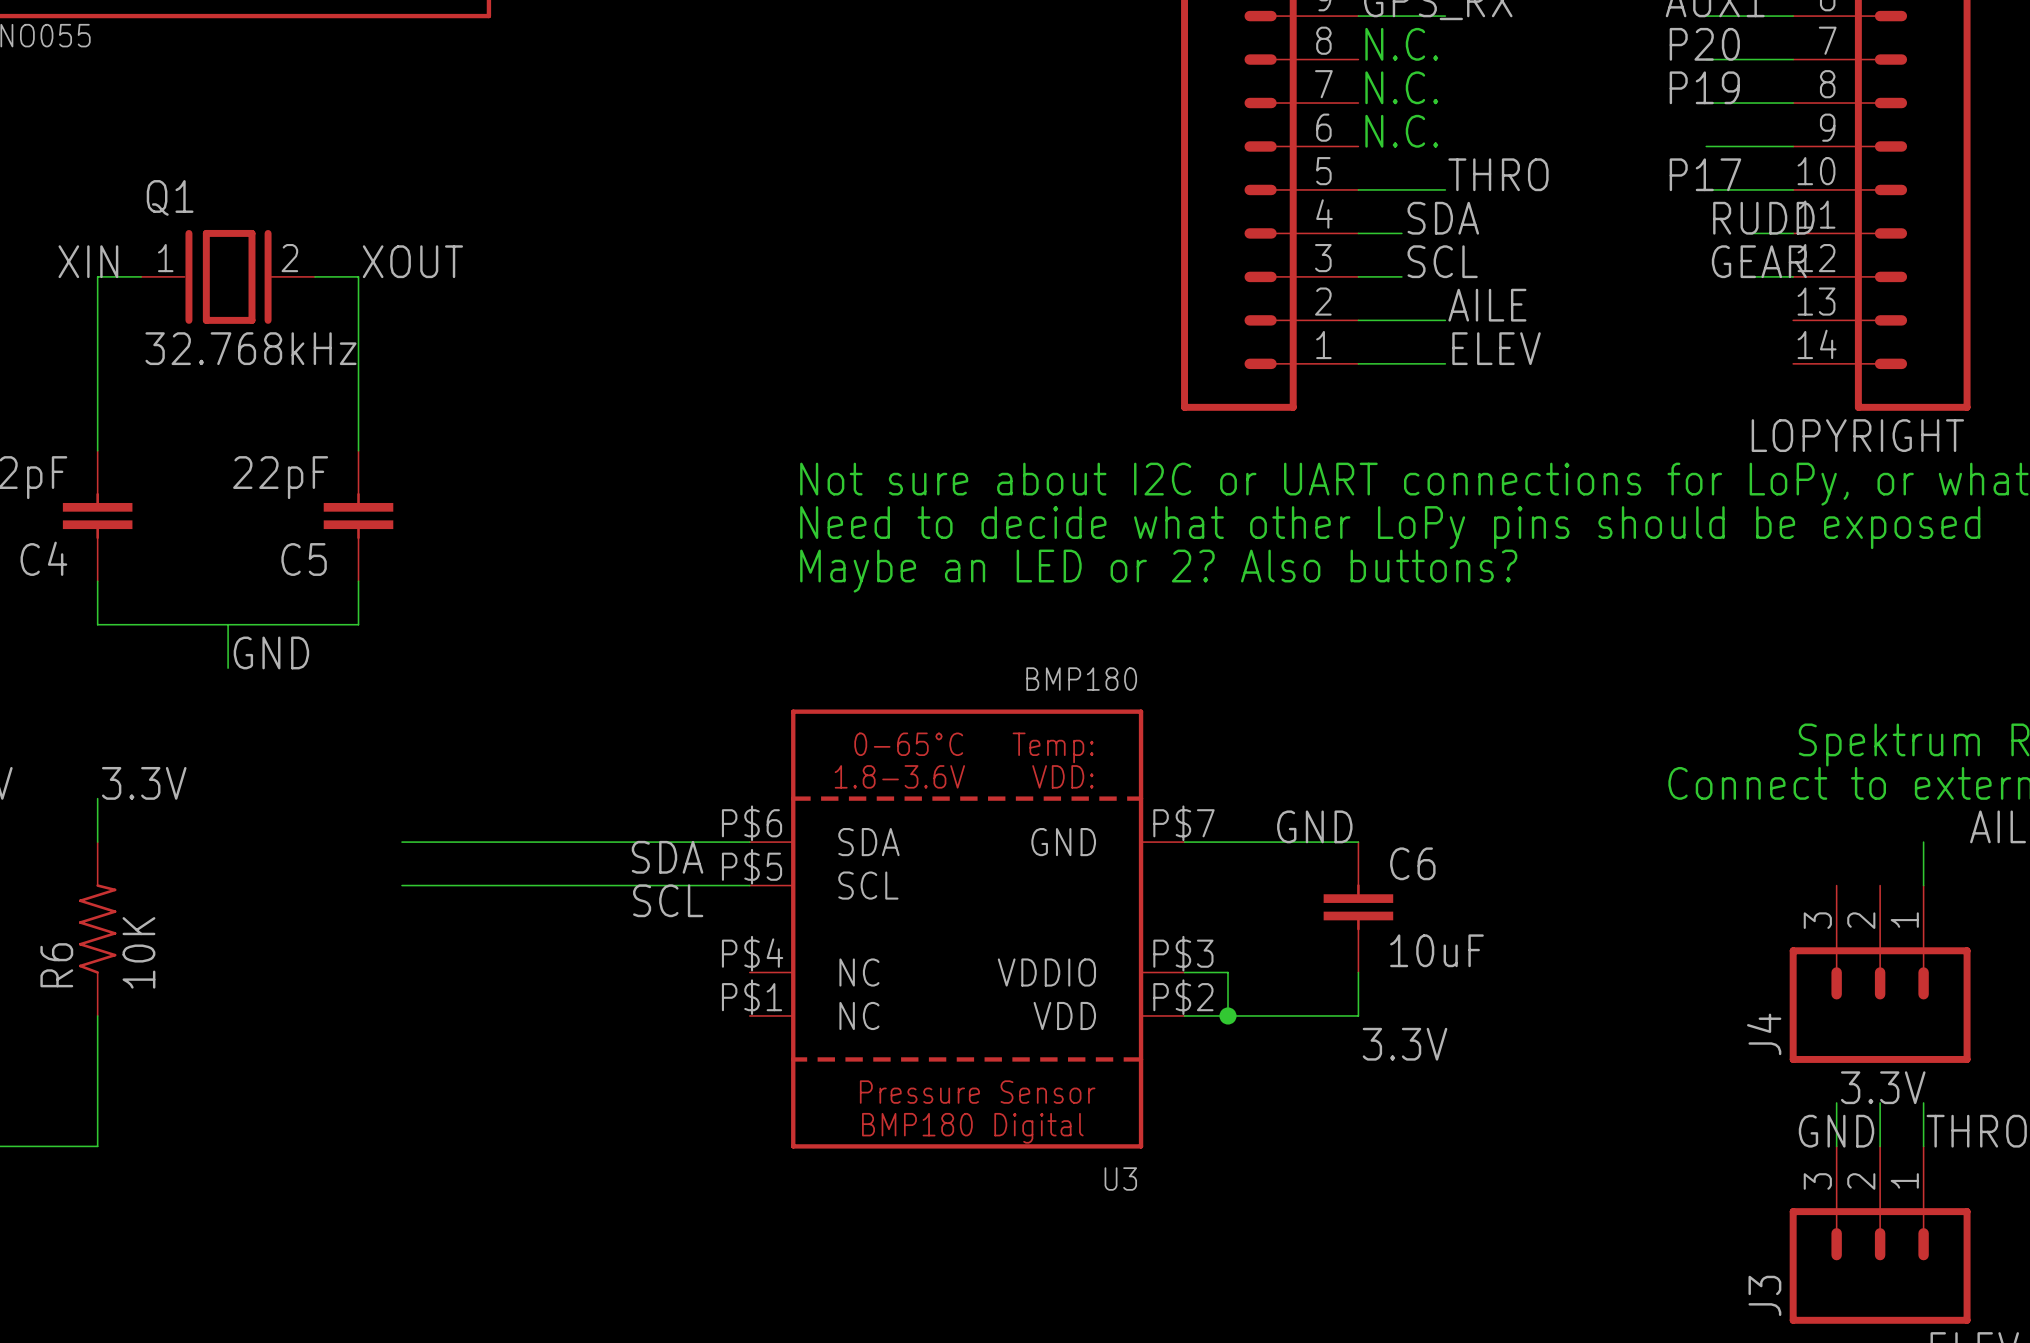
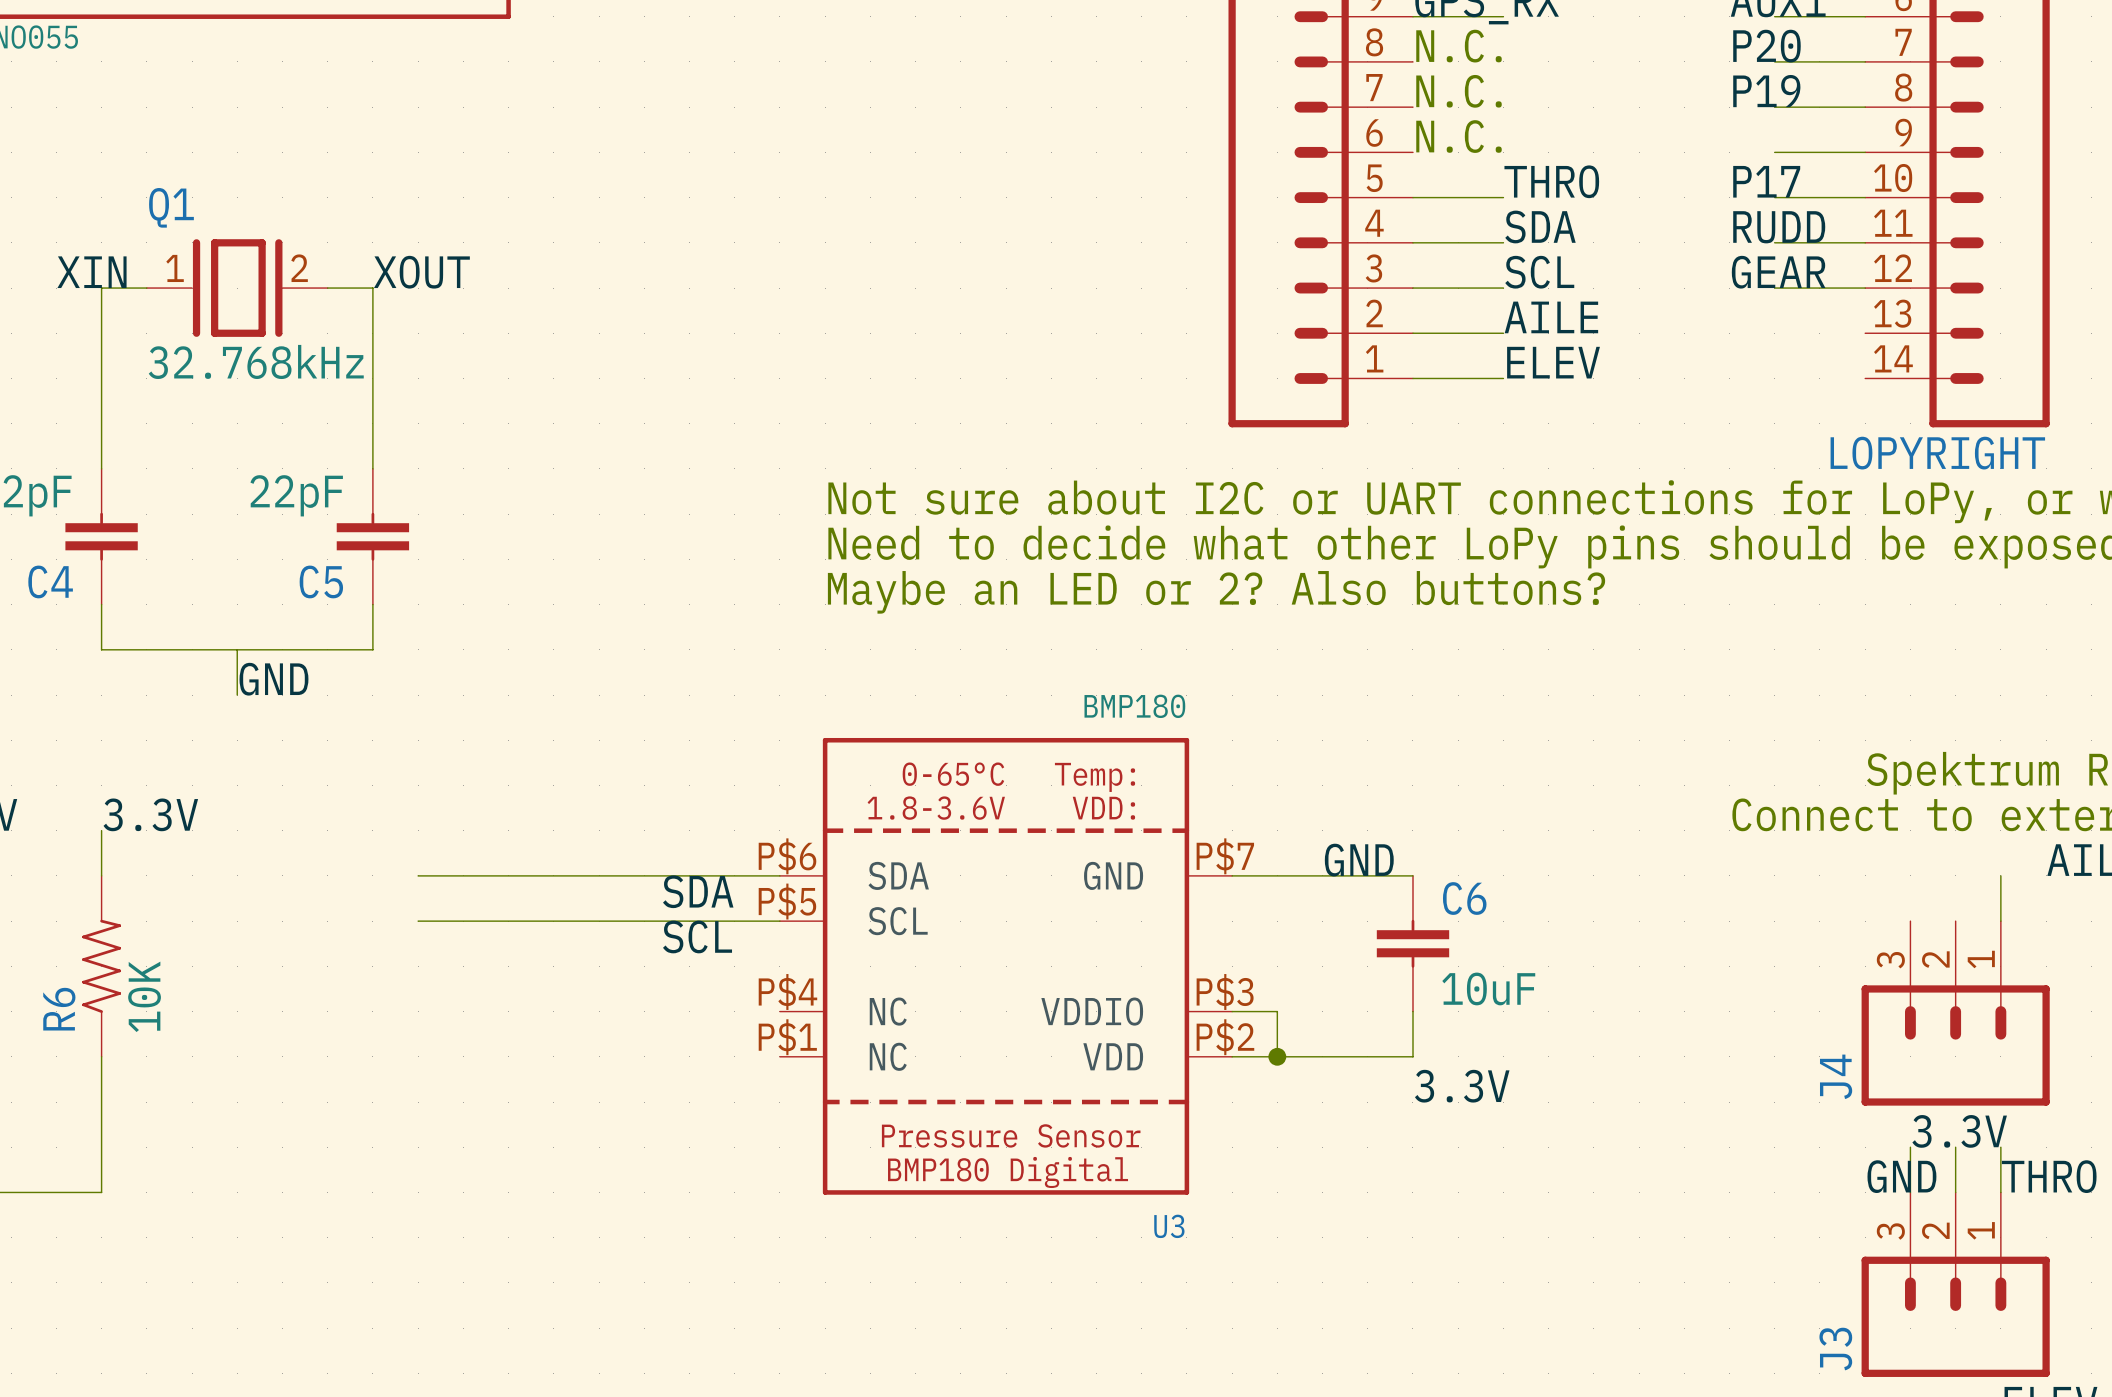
label position: SDA (1443, 218) -> SDA (1540, 226)
label position: RUDD (1763, 218) -> RUDD (1779, 227)
wire: none -> (1458, 242) (1503, 242)
wire: none -> (1774, 242) (1819, 242)
label position: SCL (1442, 261) -> SCL (1539, 272)
label position: GEAR (1759, 261) -> GEAR (1778, 272)
wire: none -> (1458, 288) (1503, 288)
wire: none -> (1774, 288) (1819, 288)

